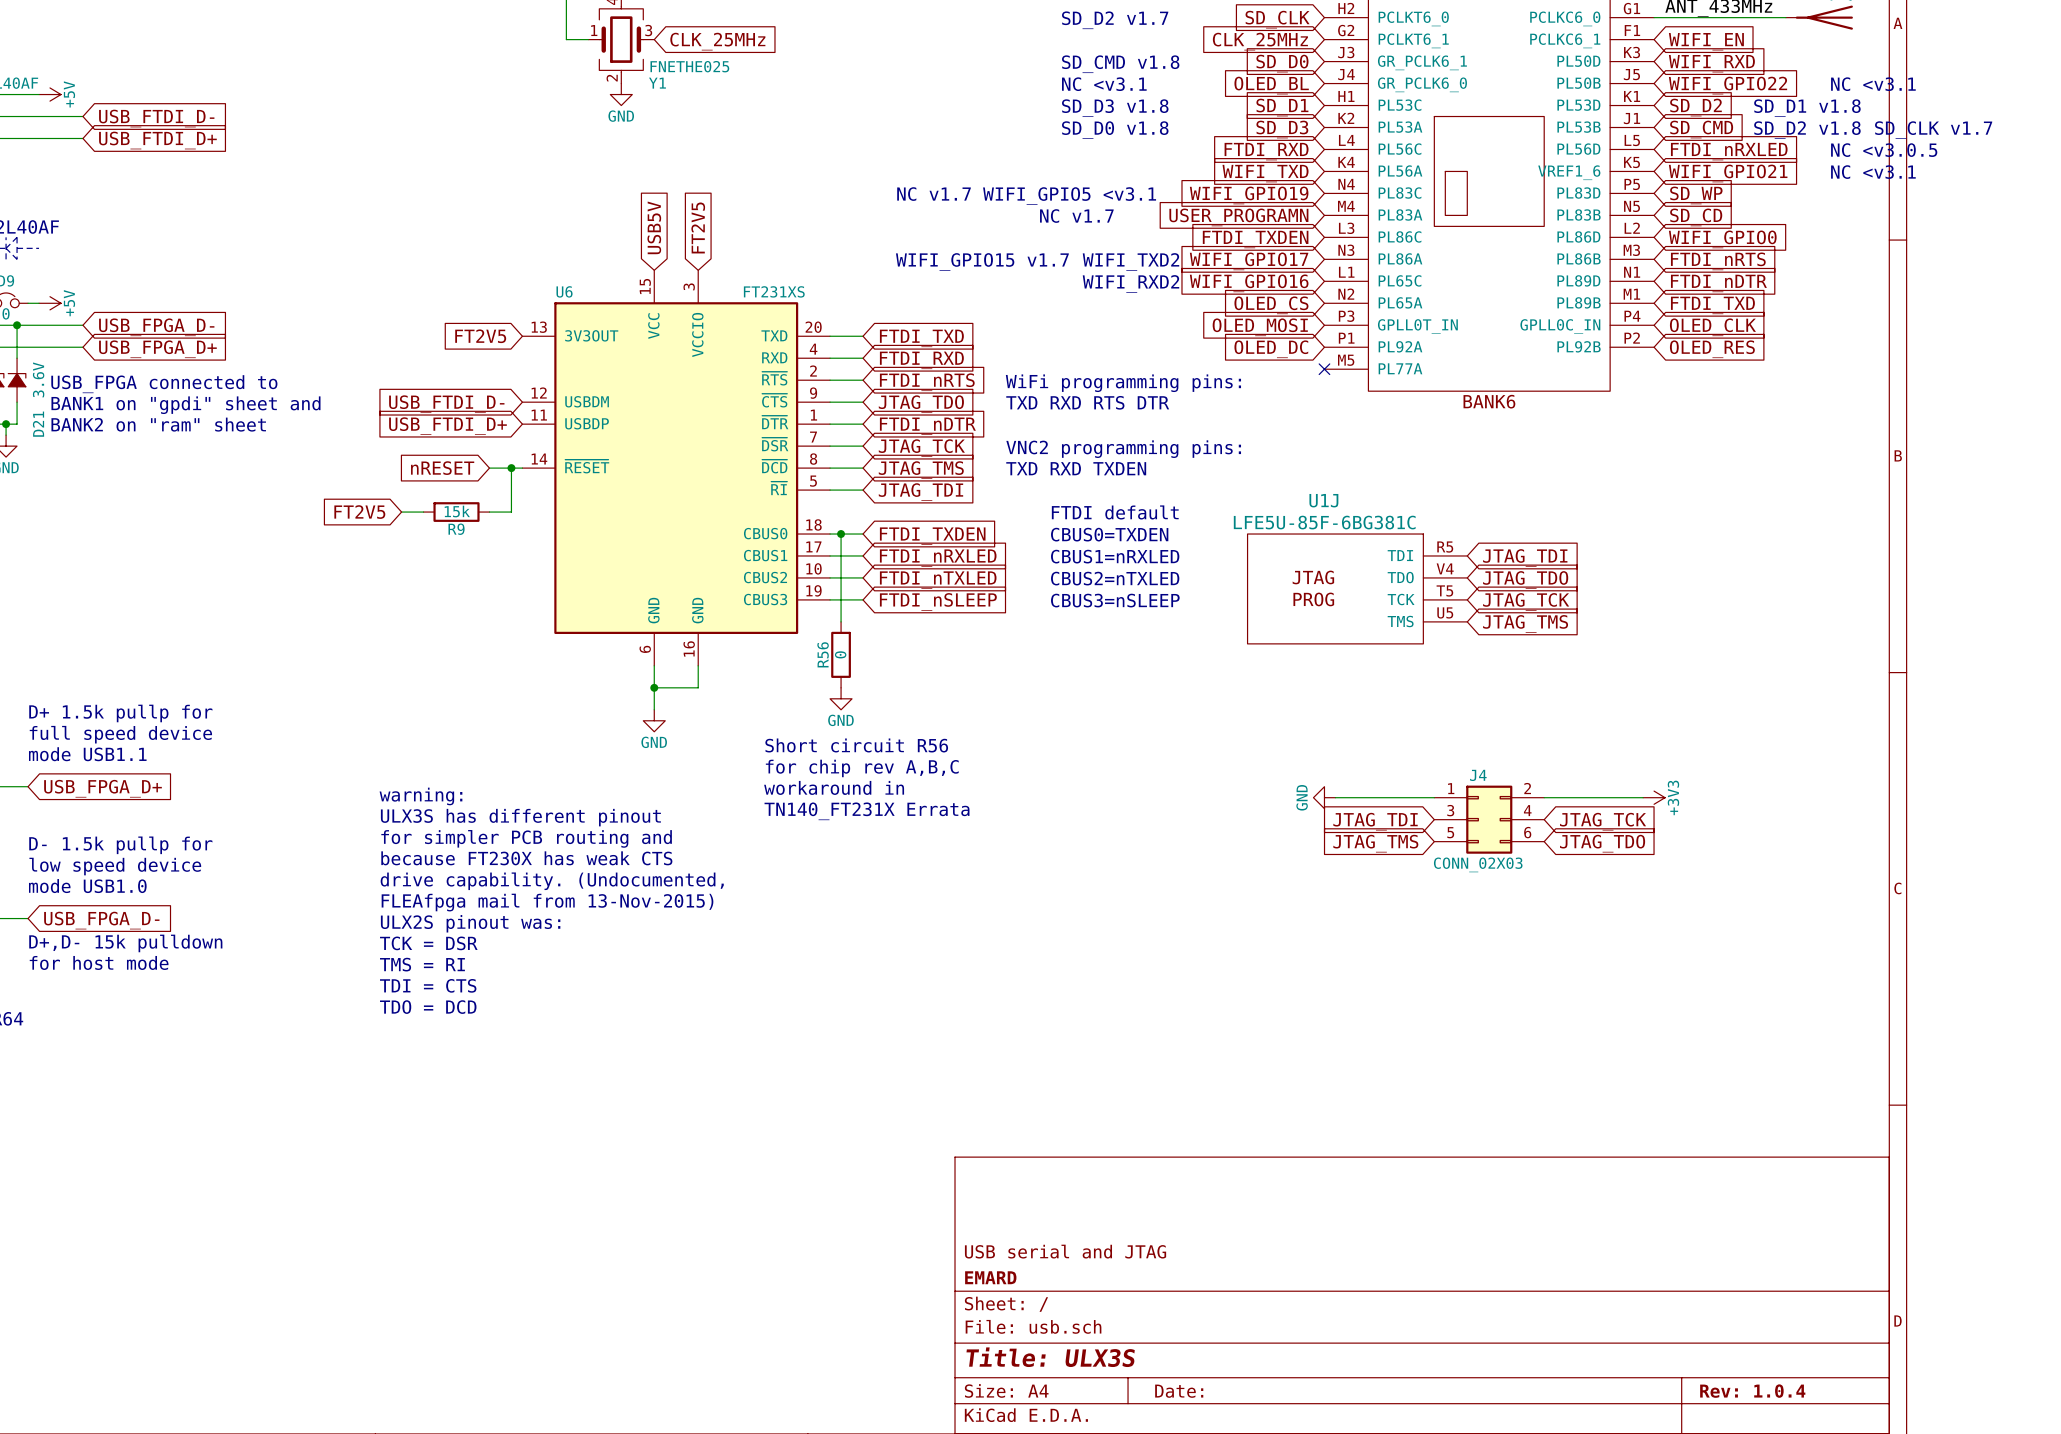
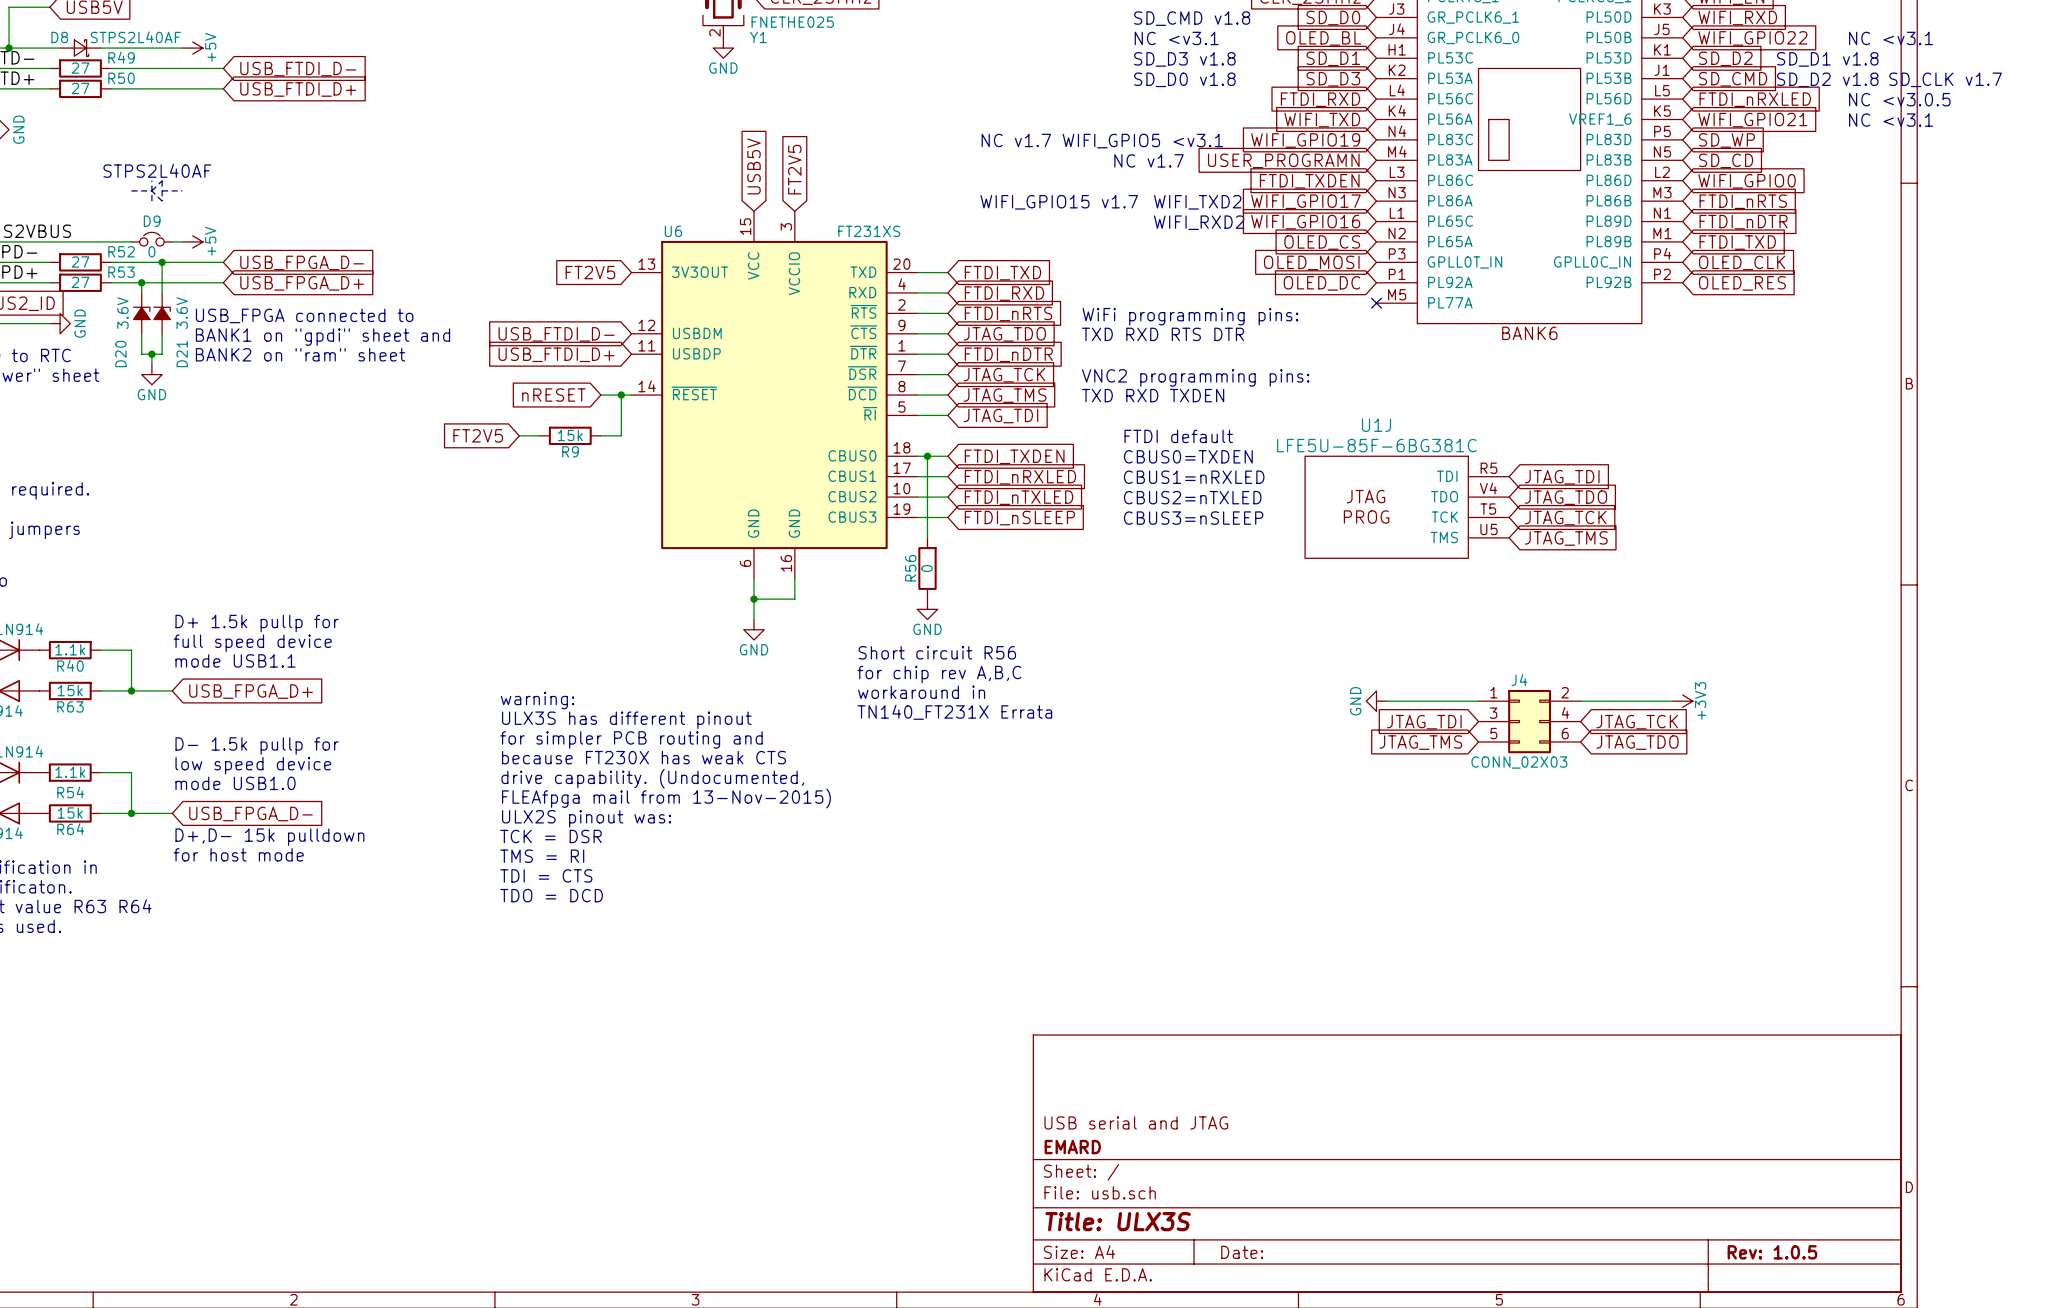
title block: Rev: 1.0.4 (1752, 1391) -> Rev: 1.0.5 (1772, 1252)

